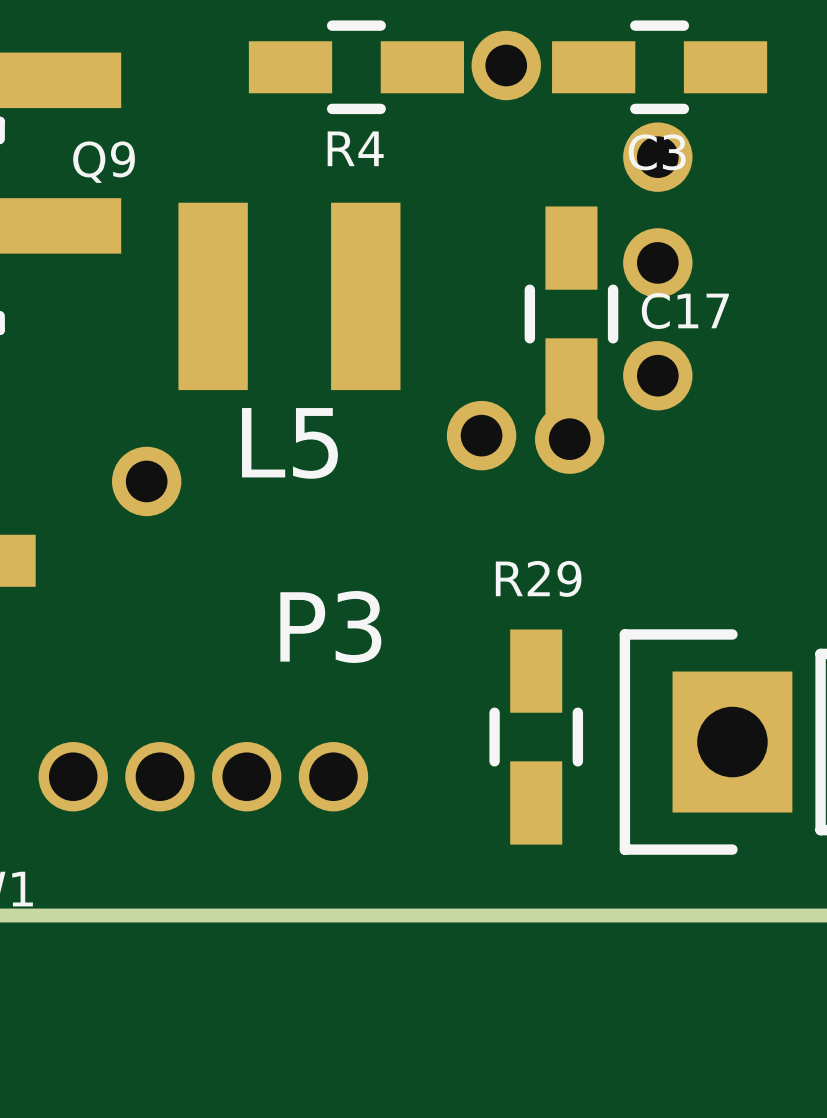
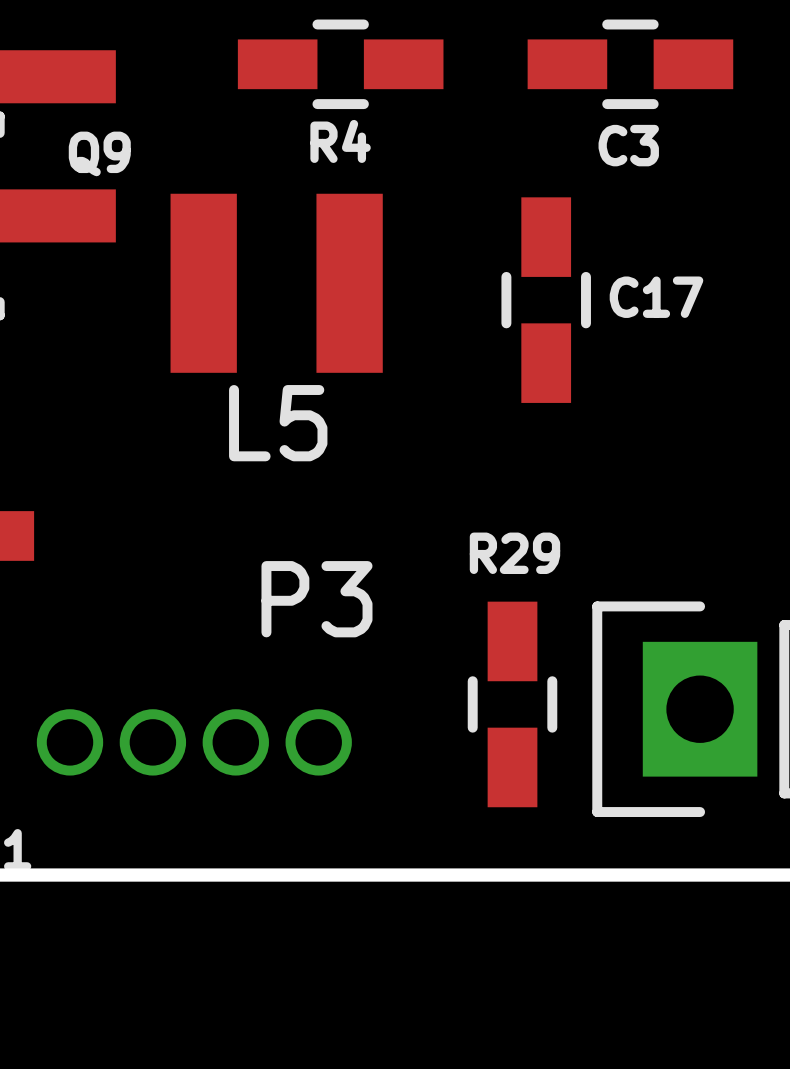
part: (506, 65) -> none
part: (657, 157) -> none
part: (657, 262) -> none
part: (657, 375) -> none
part: (481, 435) -> none
part: (569, 439) -> none
part: (146, 481) -> none

